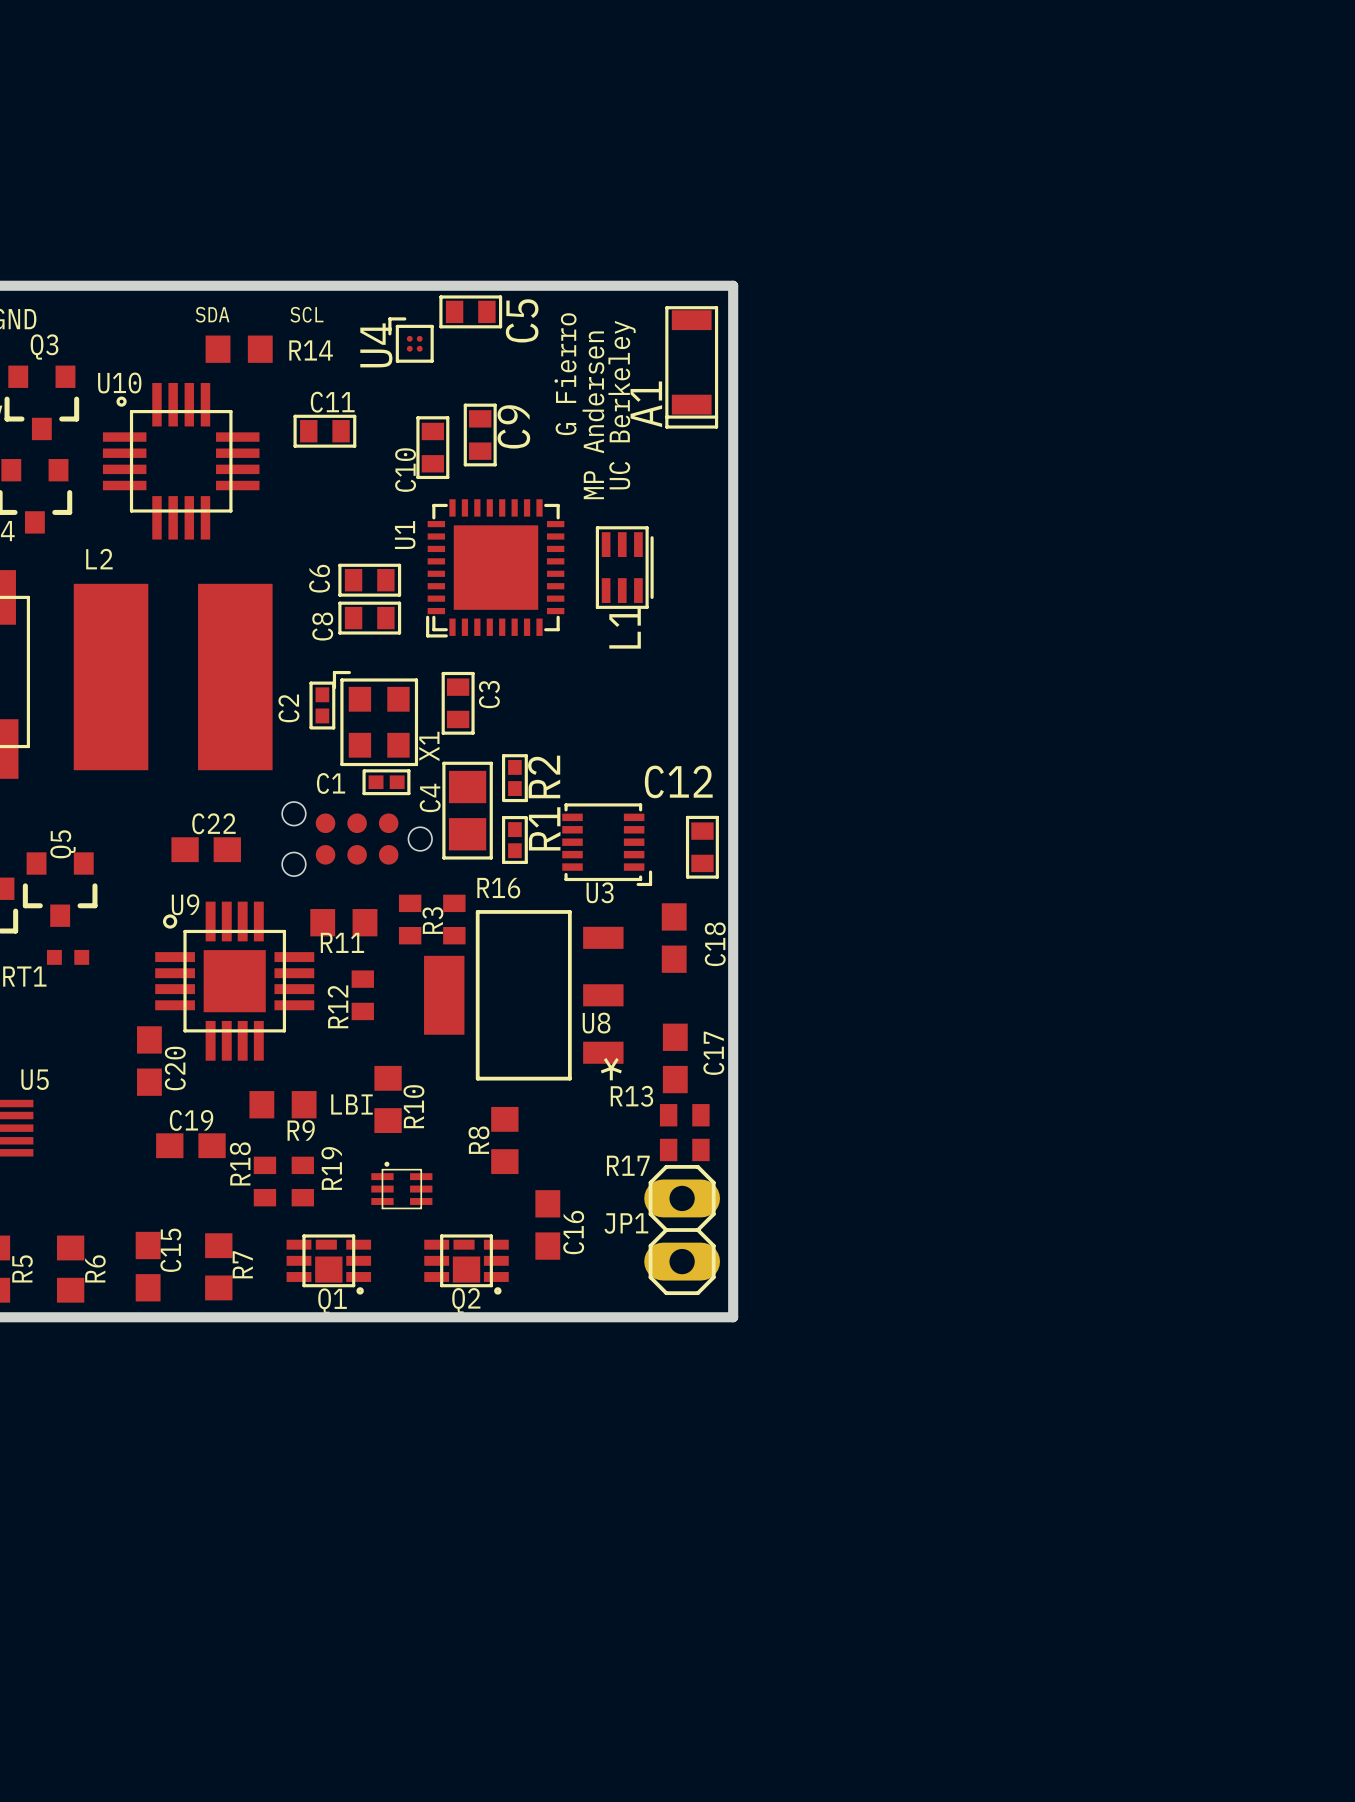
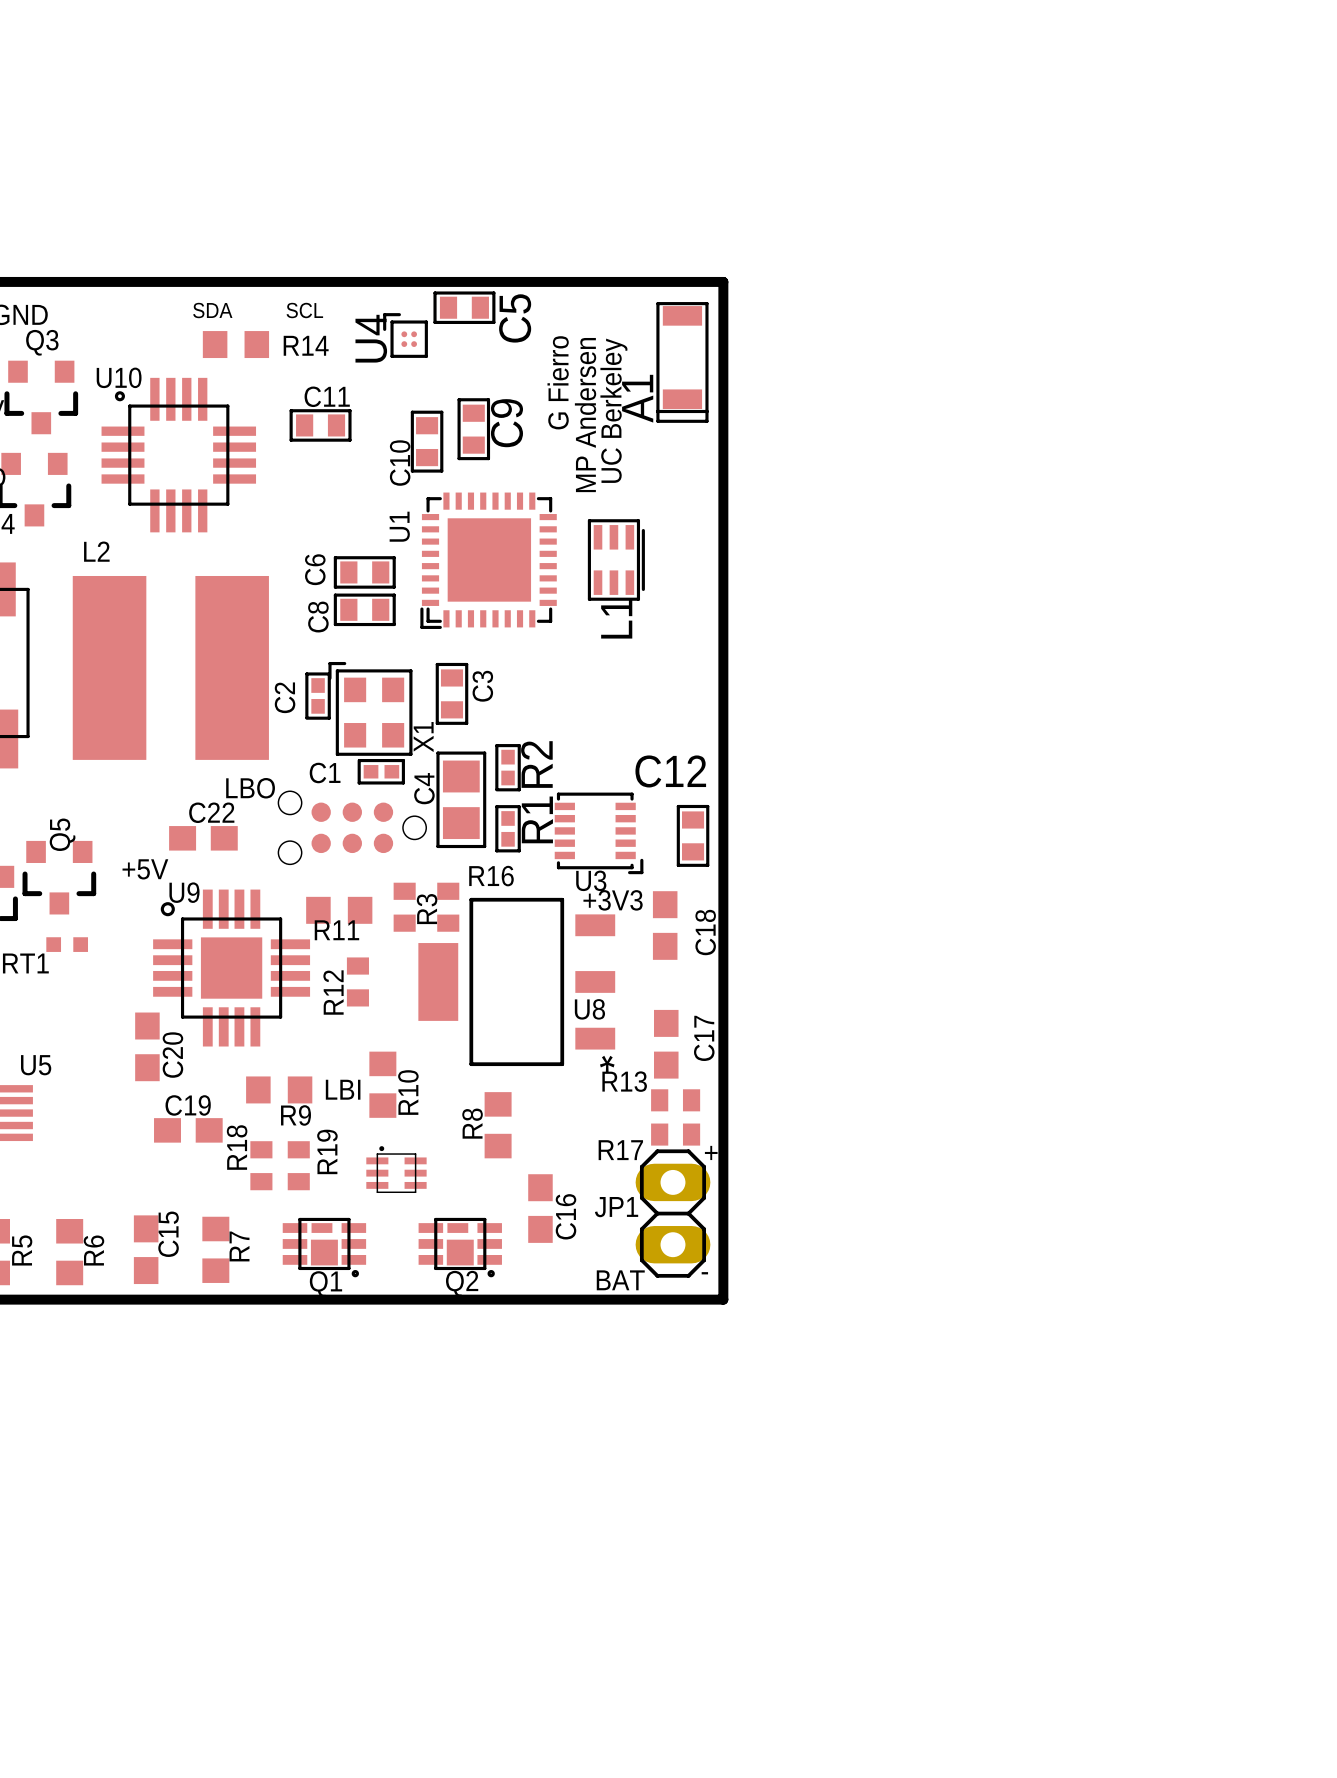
text: none -> LBO (250, 788)
text: none -> +5V (145, 869)
text: none -> +3V3 (613, 900)
text: none -> + (711, 1152)
text: none -> - (704, 1273)
text: none -> BAT (620, 1280)

